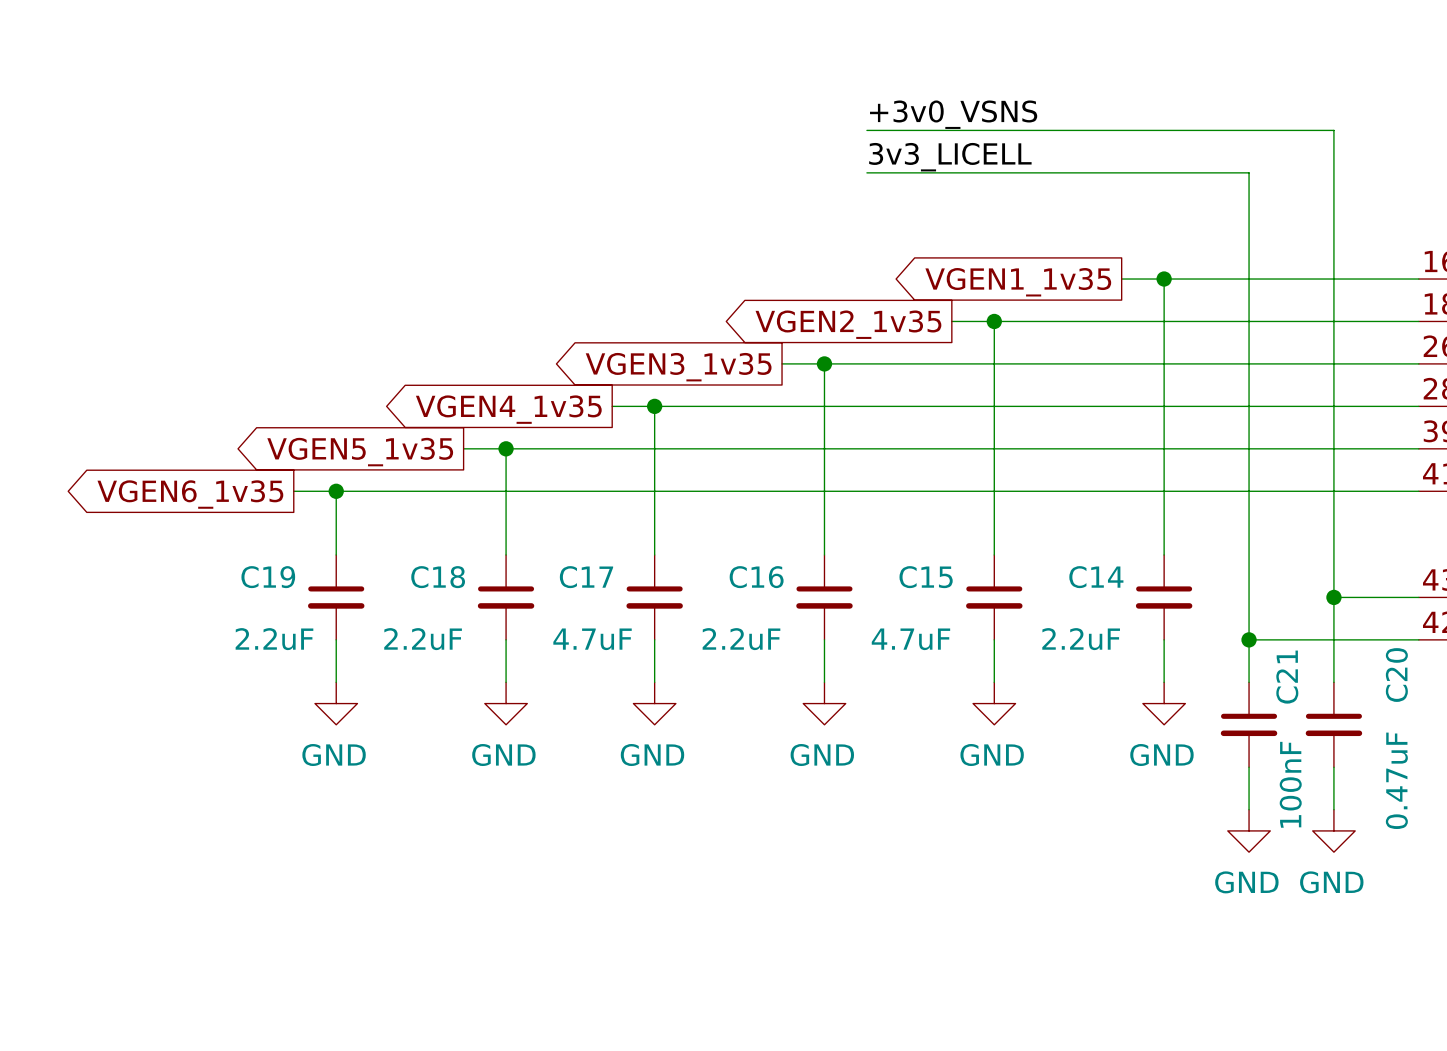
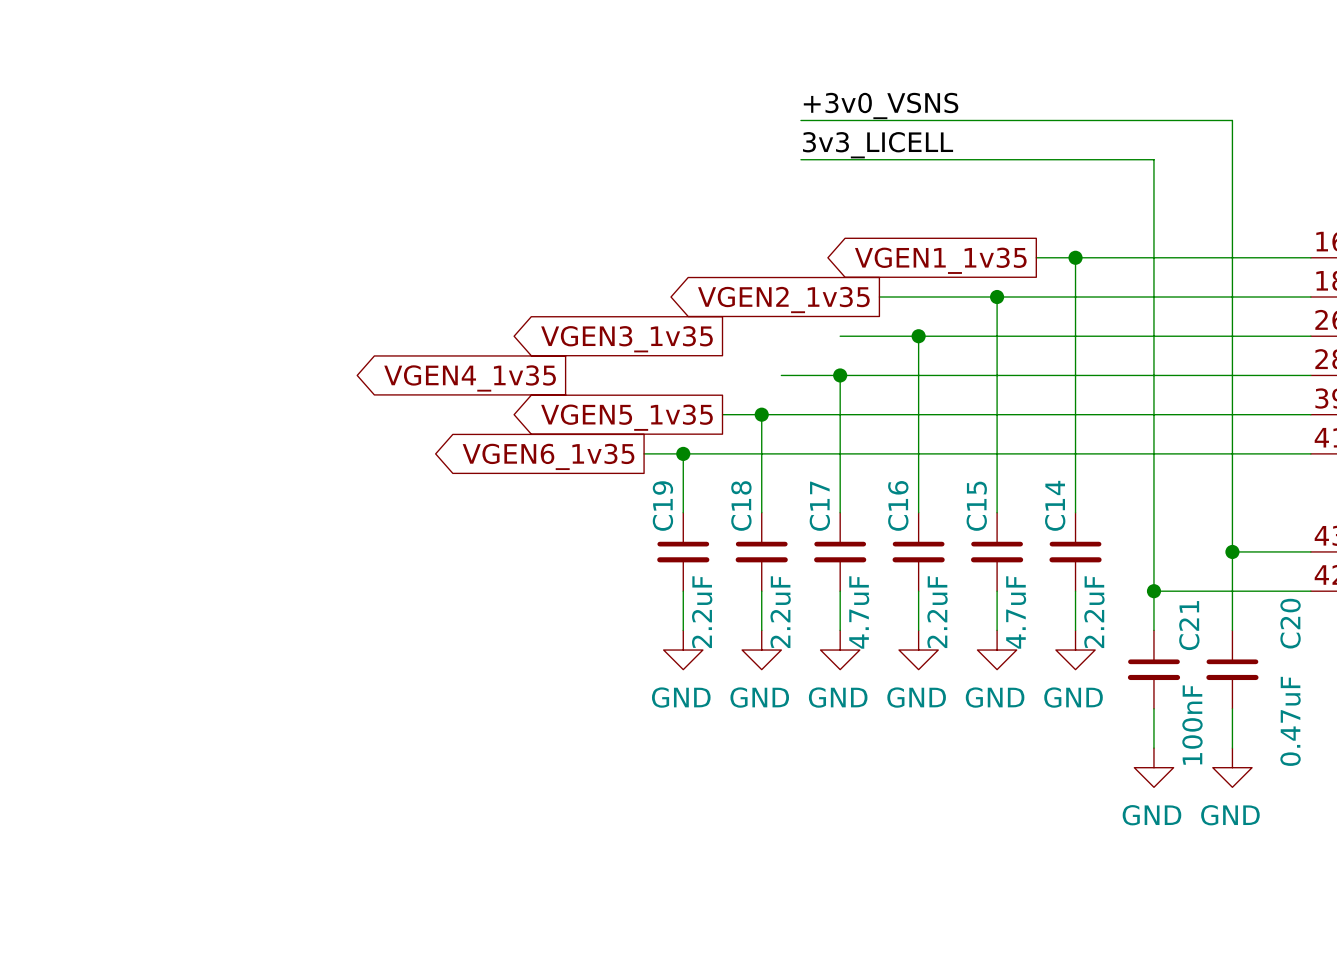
wire: (994, 321) (994, 363) -> (997, 591) (997, 630)
junction: (994, 321) -> none
wire: none -> (997, 297) (997, 512)
junction: none -> (997, 297)
wire: (782, 363) (909, 363) -> none
wire: (824, 363) (824, 448) -> none
junction: (824, 363) -> none
junction: none -> (918, 336)
wire: (612, 406) (845, 406) -> none
wire: (654, 406) (654, 554) -> (840, 375) (840, 512)
junction: (654, 406) -> none
junction: none -> (840, 375)
wire: (463, 448) (782, 448) -> none
wire: (506, 448) (506, 554) -> none
junction: (506, 448) -> none
junction: none -> (761, 414)
global label position: VGEN5_1v35 (360, 452) -> VGEN5_1v35 (626, 417)
wire: (293, 491) (697, 491) -> none
wire: (336, 491) (336, 554) -> (683, 453) (683, 512)
junction: (336, 491) -> none
junction: none -> (683, 453)
global label position: VGEN6_1v35 (190, 494) -> VGEN6_1v35 (548, 456)
C19 name rotation: 0° (268, 577) -> 90° counterclockwise (662, 506)
C17 name rotation: 0° (586, 577) -> 90° counterclockwise (819, 506)
C16 name: C16 (756, 577) -> C18 (741, 506)
C15 name: C15 (926, 577) -> C16 (898, 505)
C14 name rotation: 0° (1096, 577) -> 90° counterclockwise (1055, 505)
C19 position: (336, 597) -> (683, 551)
C18: 2.2uF (506, 597) -> none
C17 position: (654, 597) -> (840, 551)
C15: none -> 4.7uF (997, 551)
C19 value rotation: 0° (274, 639) -> 90° counterclockwise (702, 612)
wire: (336, 639) (336, 682) -> (683, 591) (683, 630)
wire: (506, 639) (506, 682) -> (840, 591) (840, 630)
C17 value rotation: 0° (592, 639) -> 90° counterclockwise (859, 612)
wire: (654, 639) (654, 682) -> none
C16 value rotation: 0° (741, 639) -> 90° counterclockwise (780, 612)
C16 value position: 2.2uF (741, 639) -> 2.2uF (780, 612)
C15 value: 4.7uF (910, 639) -> 2.2uF (937, 612)
C14 value rotation: 0° (1081, 639) -> 90° counterclockwise (1094, 612)
C14 value position: 2.2uF (1081, 639) -> 2.2uF (1094, 612)
power symbol: GND (336, 703) -> none
power symbol: GND (506, 703) -> none
power symbol position: GND (654, 703) -> GND (683, 650)
power symbol: none -> GND (840, 650)
power symbol: none -> GND (997, 650)

